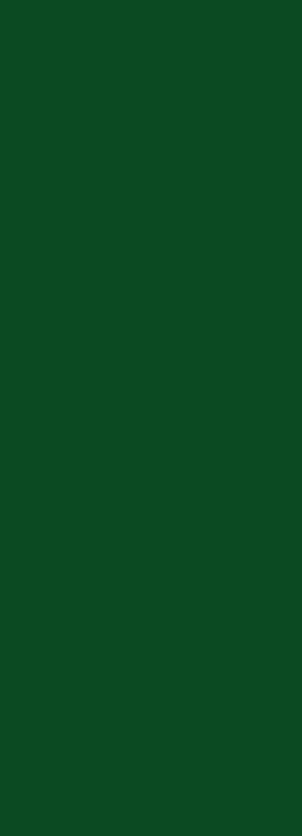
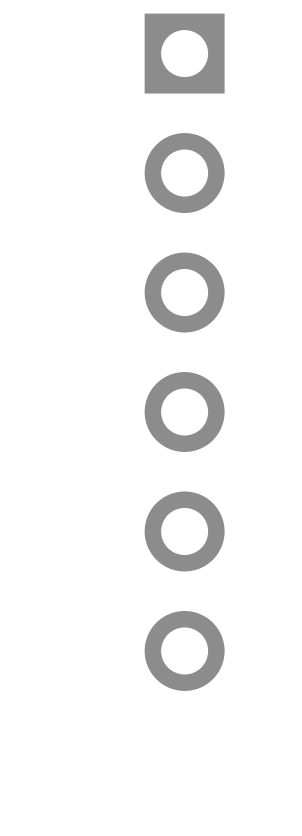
part: none -> (184, 352)

